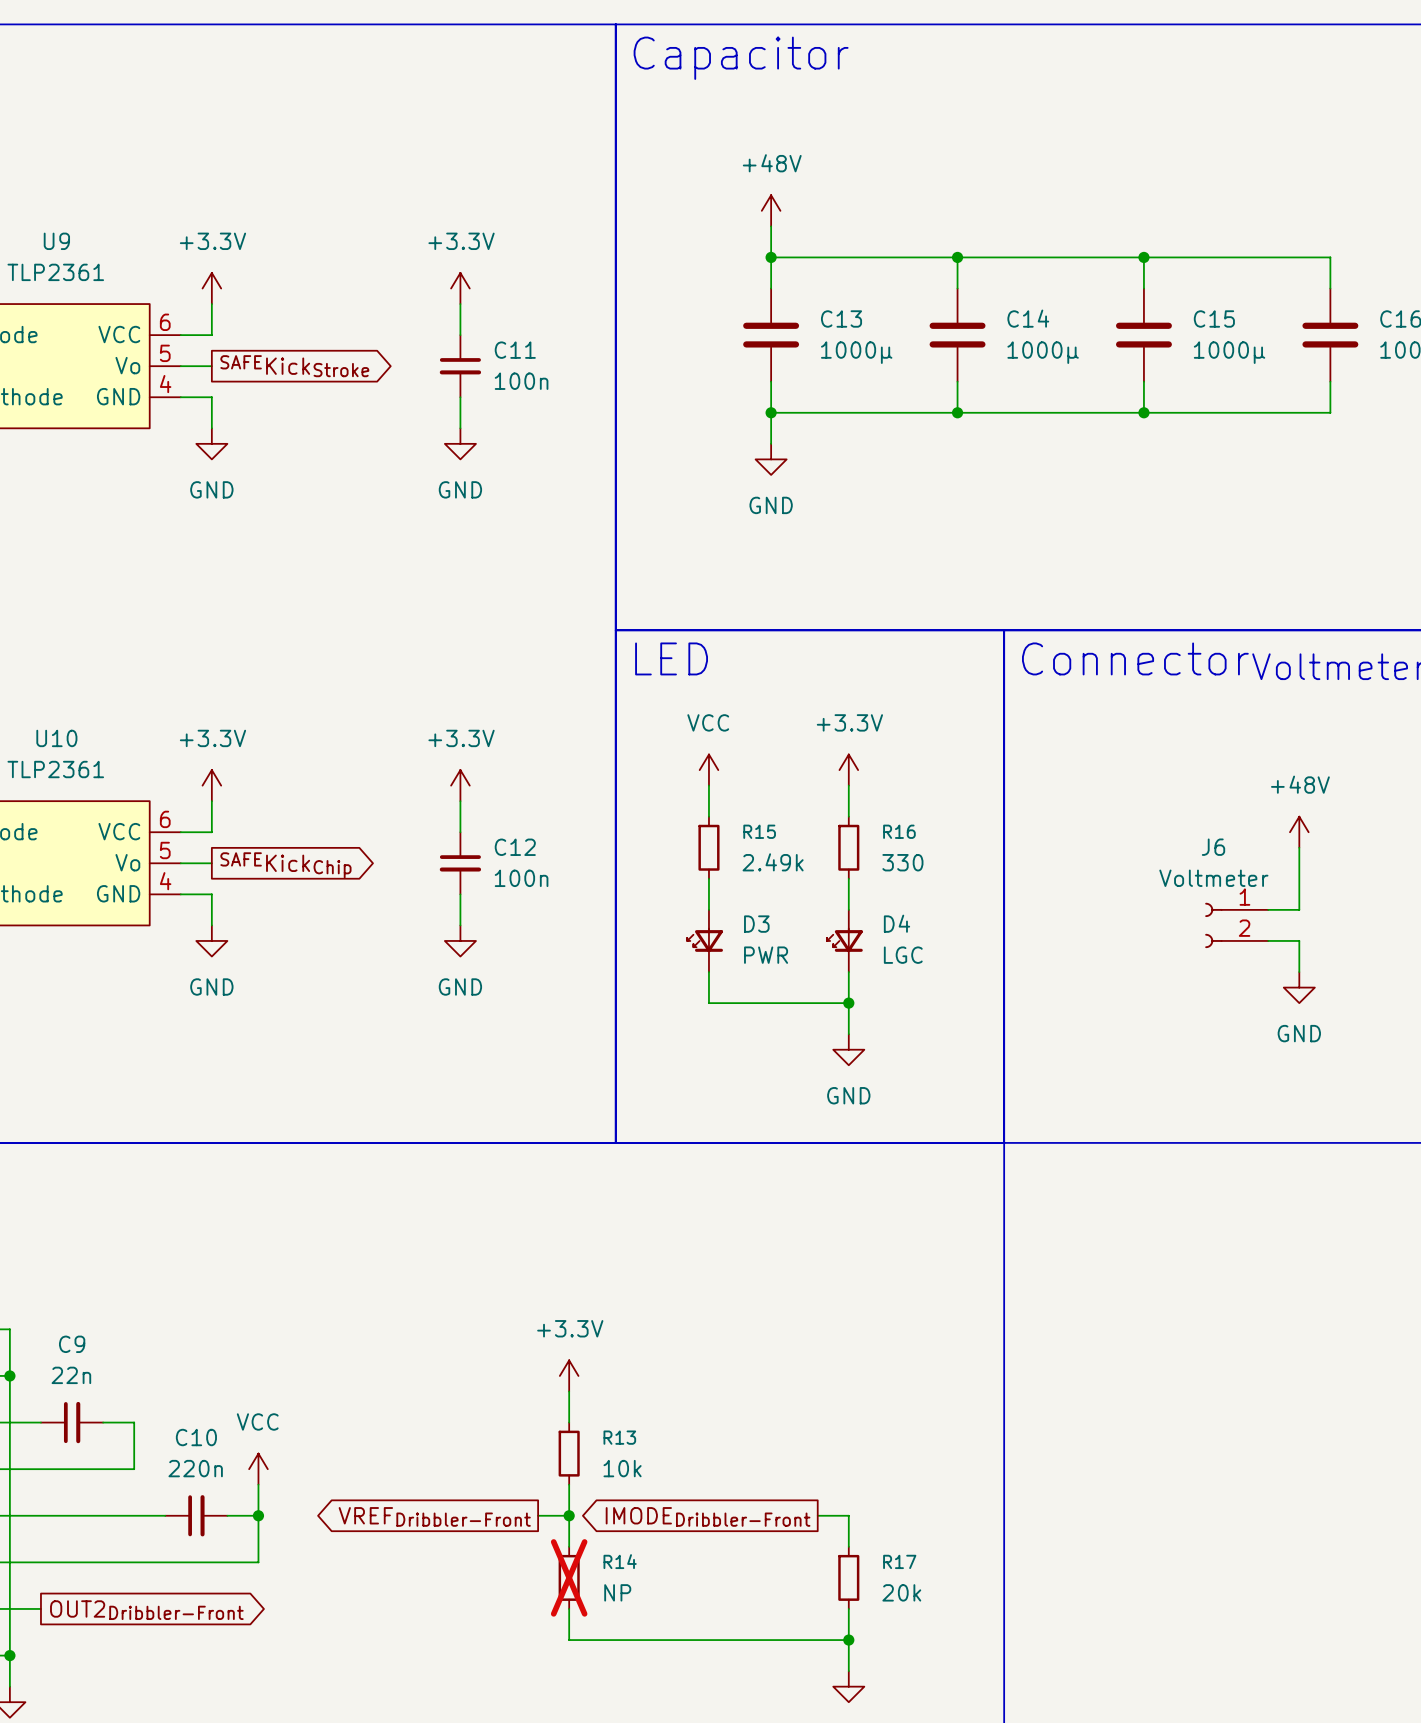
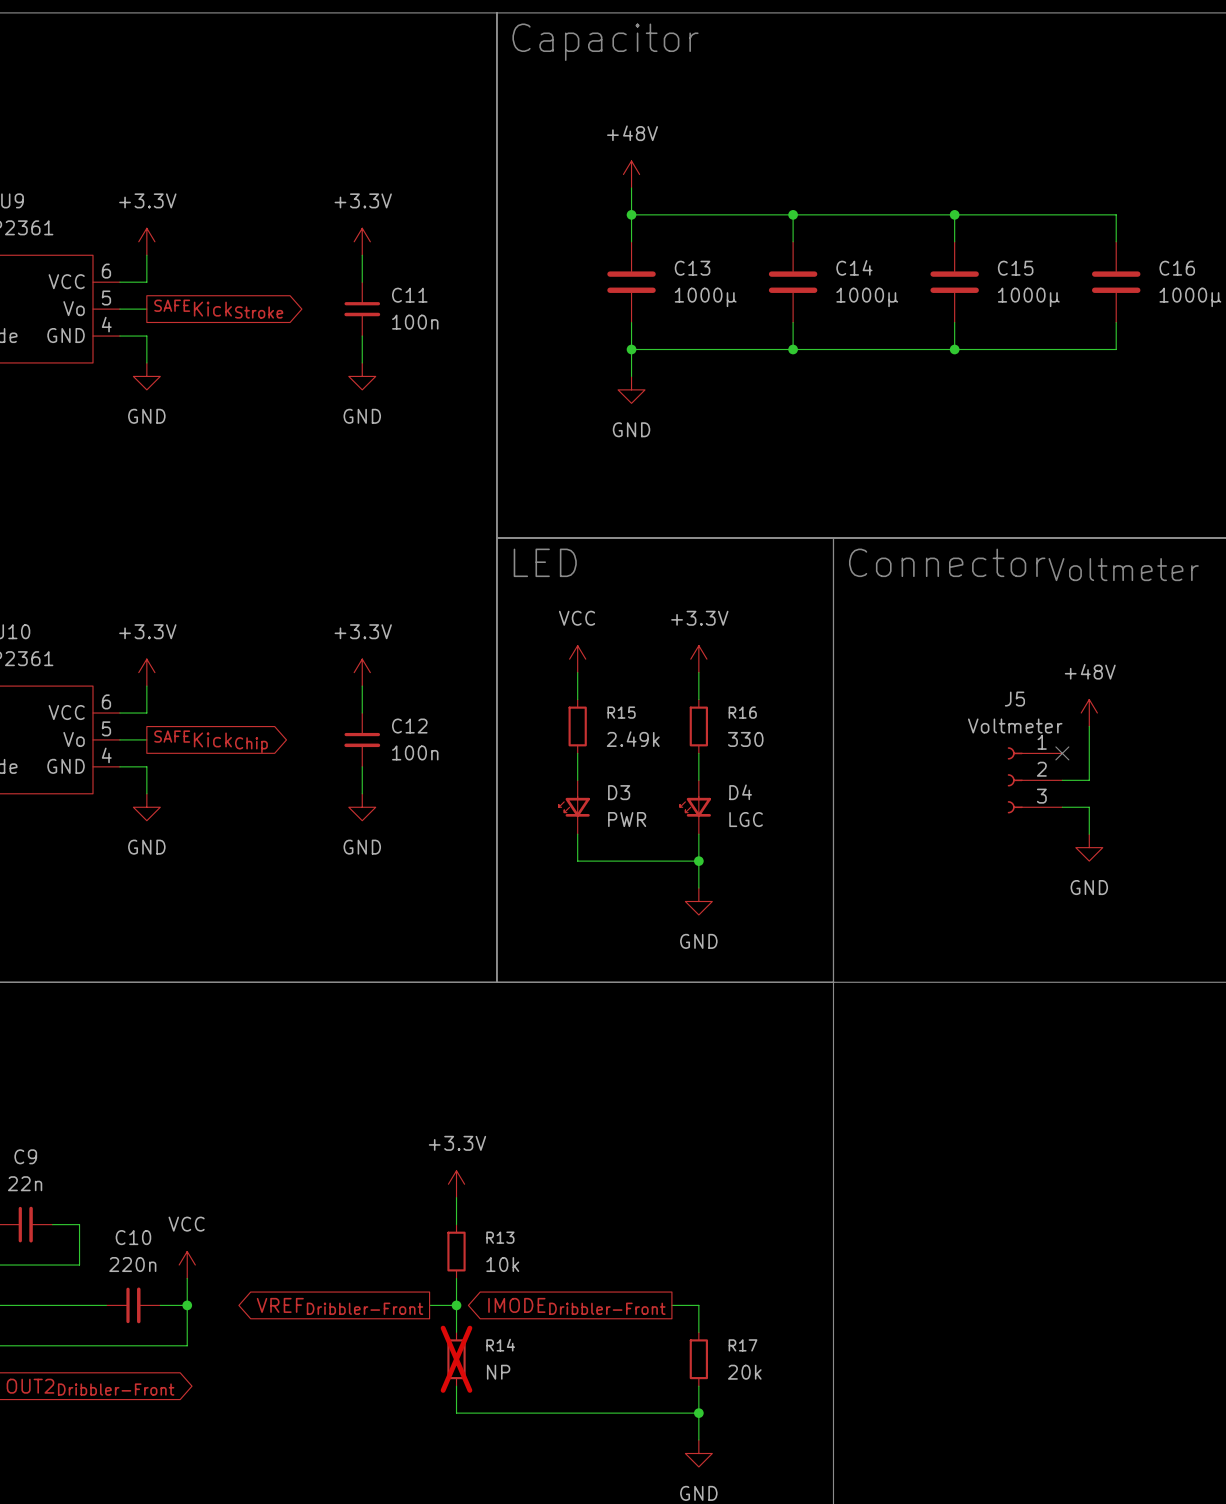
no-connect mark: none -> (1062, 753)
J5: none -> Voltmeter (1035, 780)
J6: Voltmeter (1236, 925) -> none

